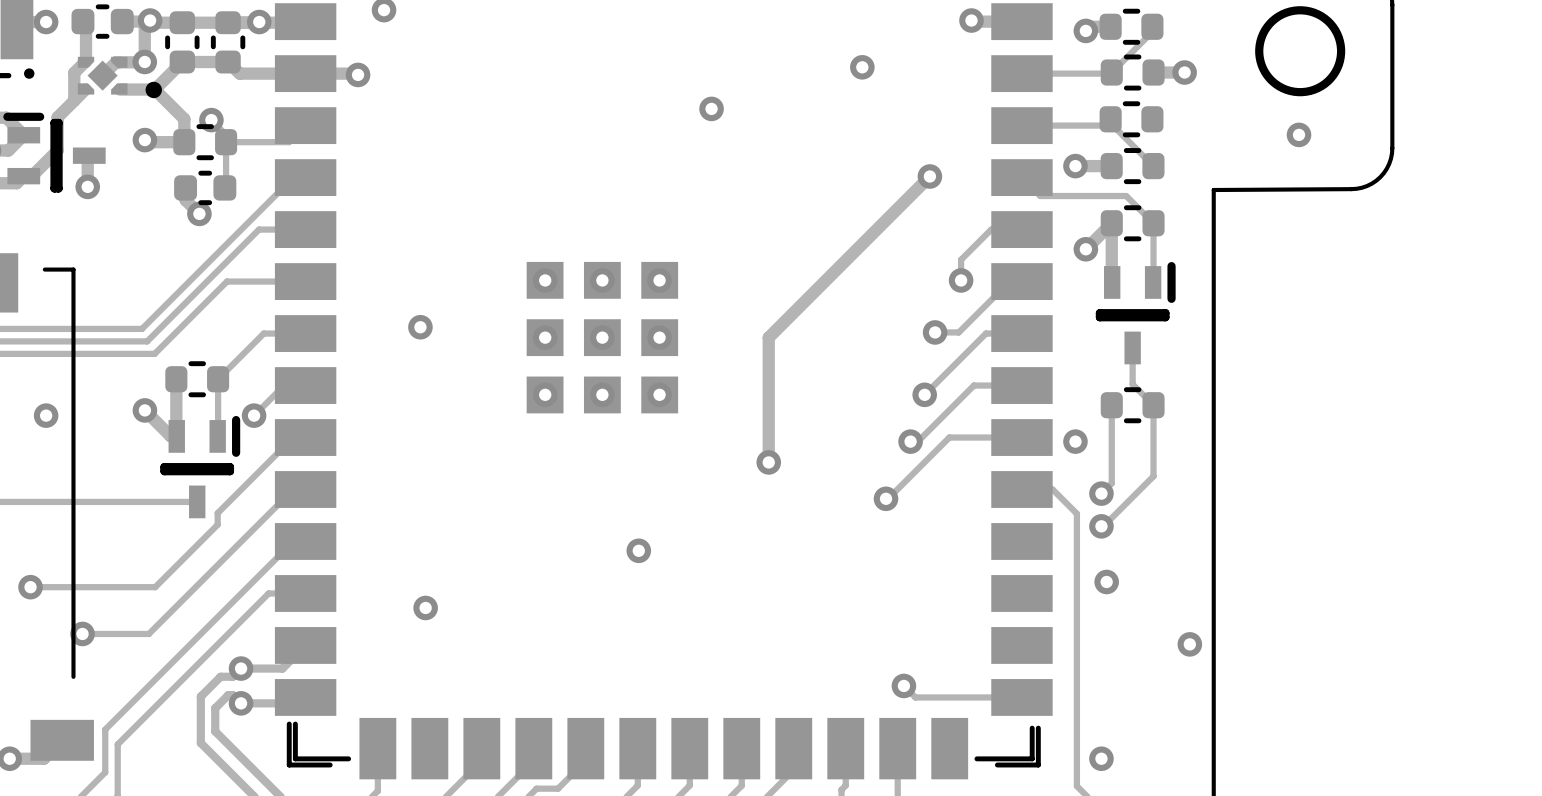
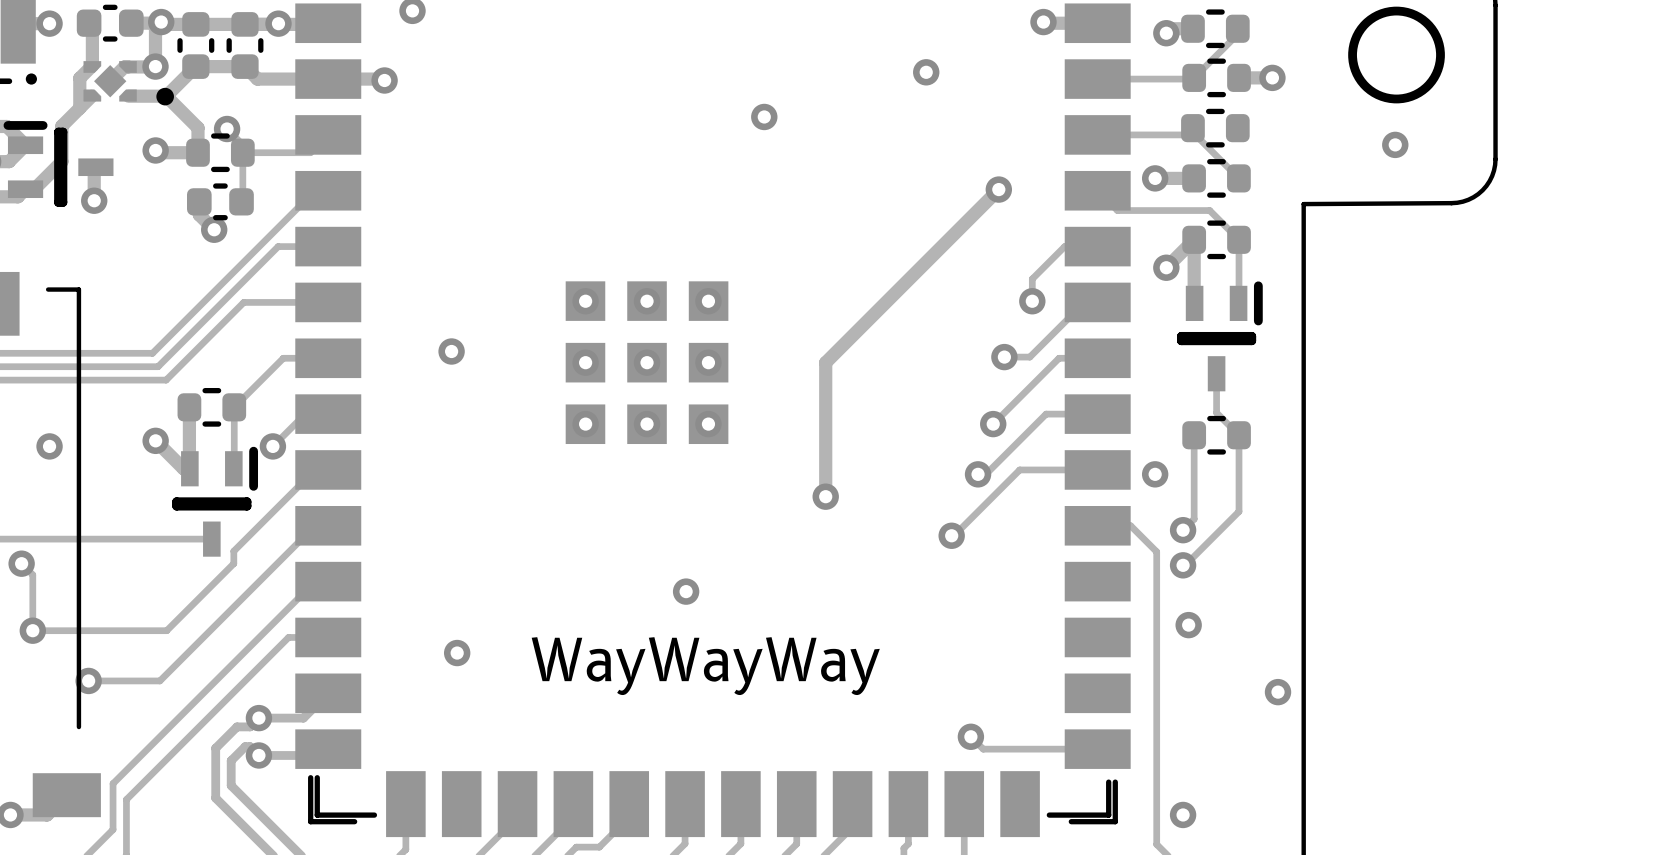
track: none -> (21, 563) (32, 574) (32, 630)
via: none -> (21, 563)
text: none -> WayWayWay (705, 666)

